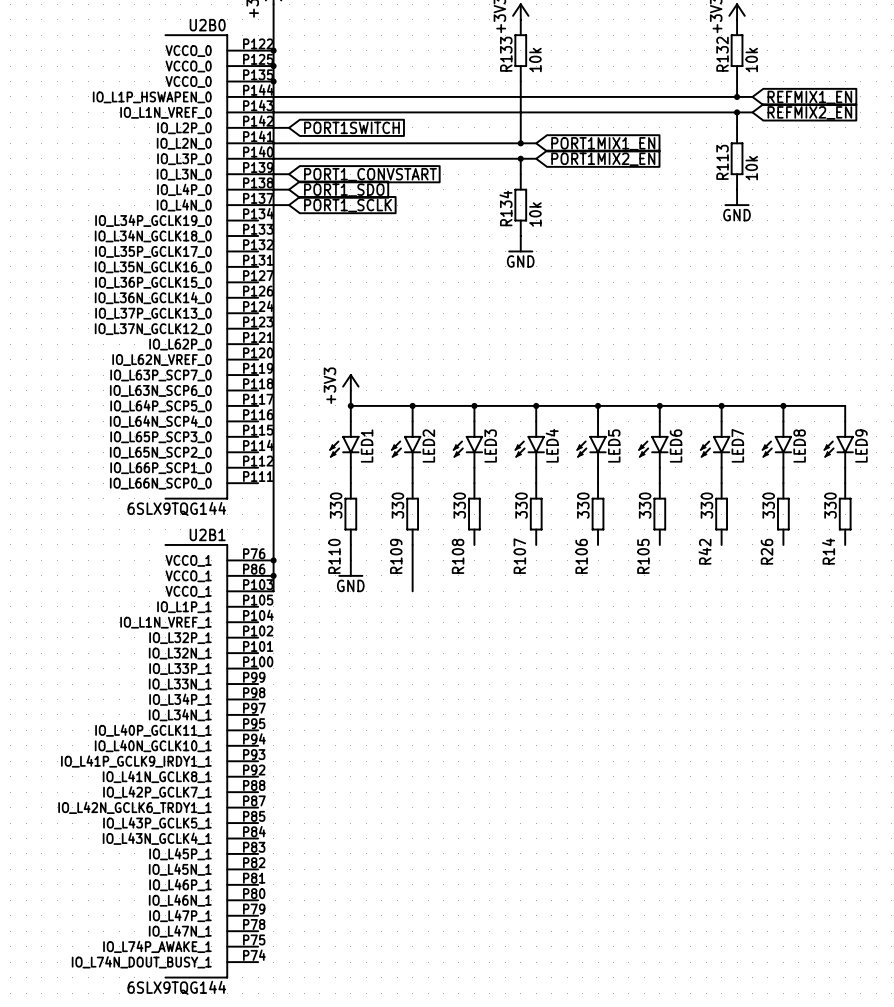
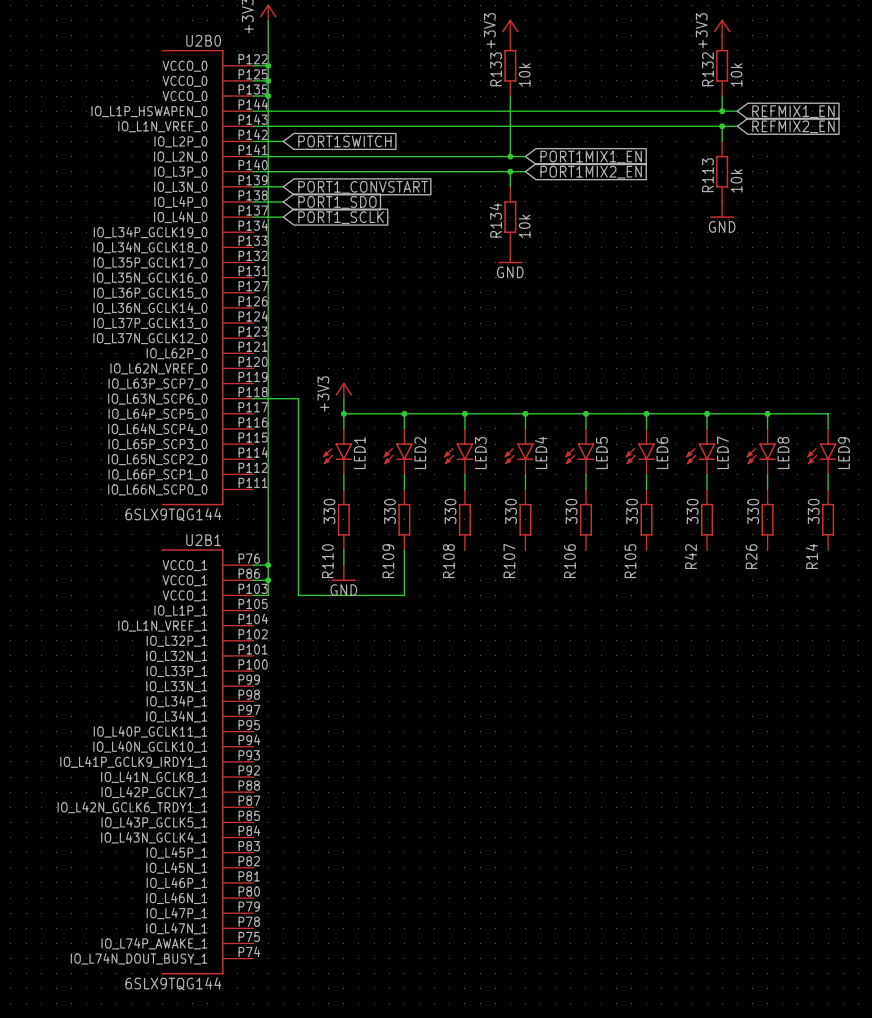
wire: none -> (253, 398) (298, 398) (298, 595) (404, 595)

